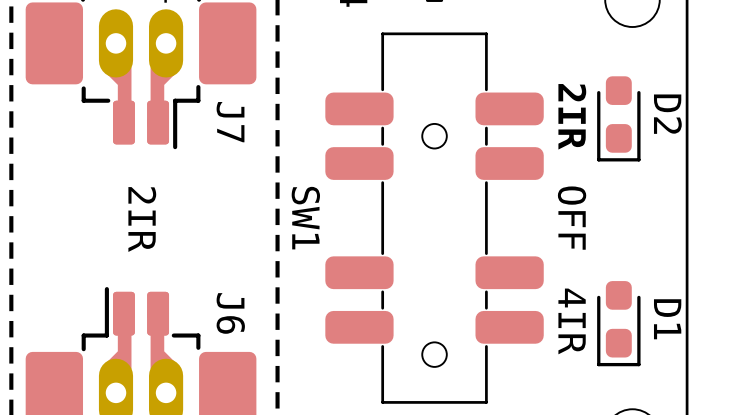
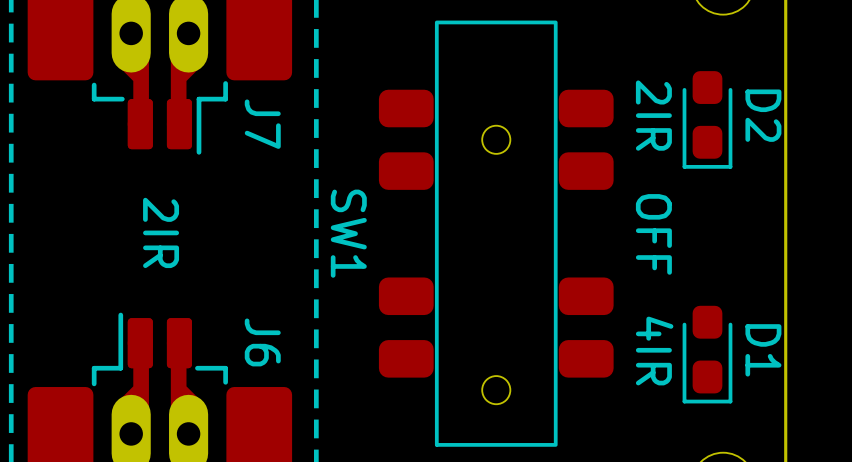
SW1 footprint: [325, 32, 544, 404] -> [378, 20, 614, 447]

